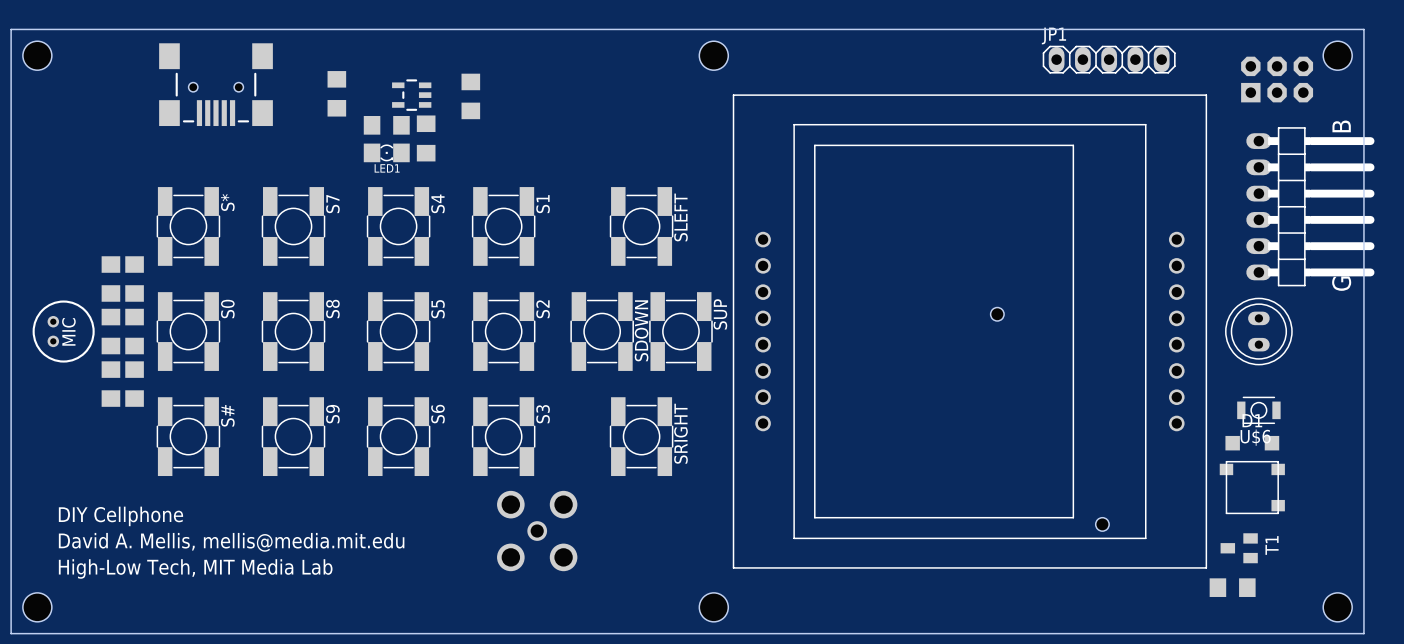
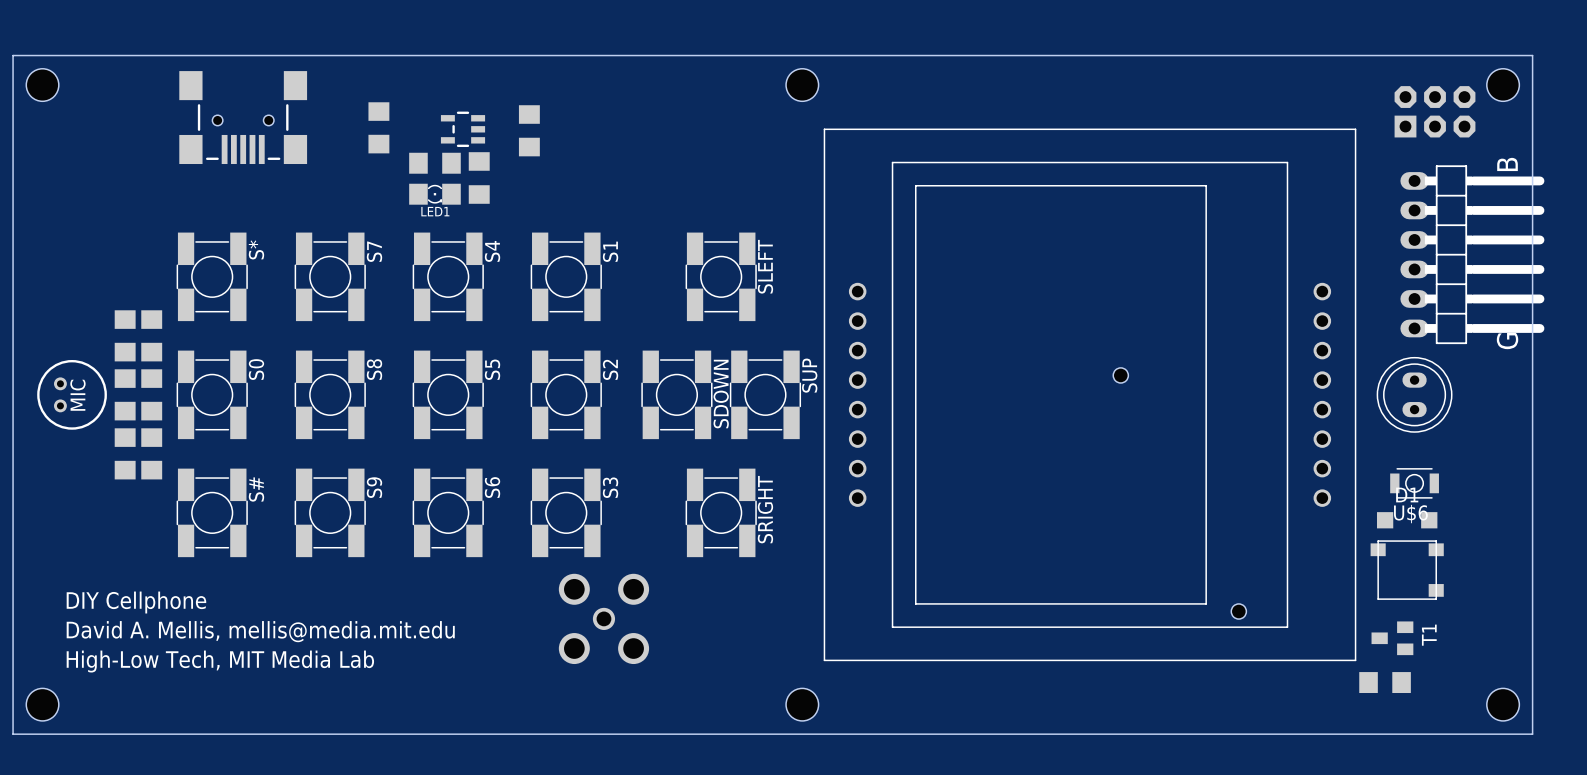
JP1: (1109, 59) -> none

